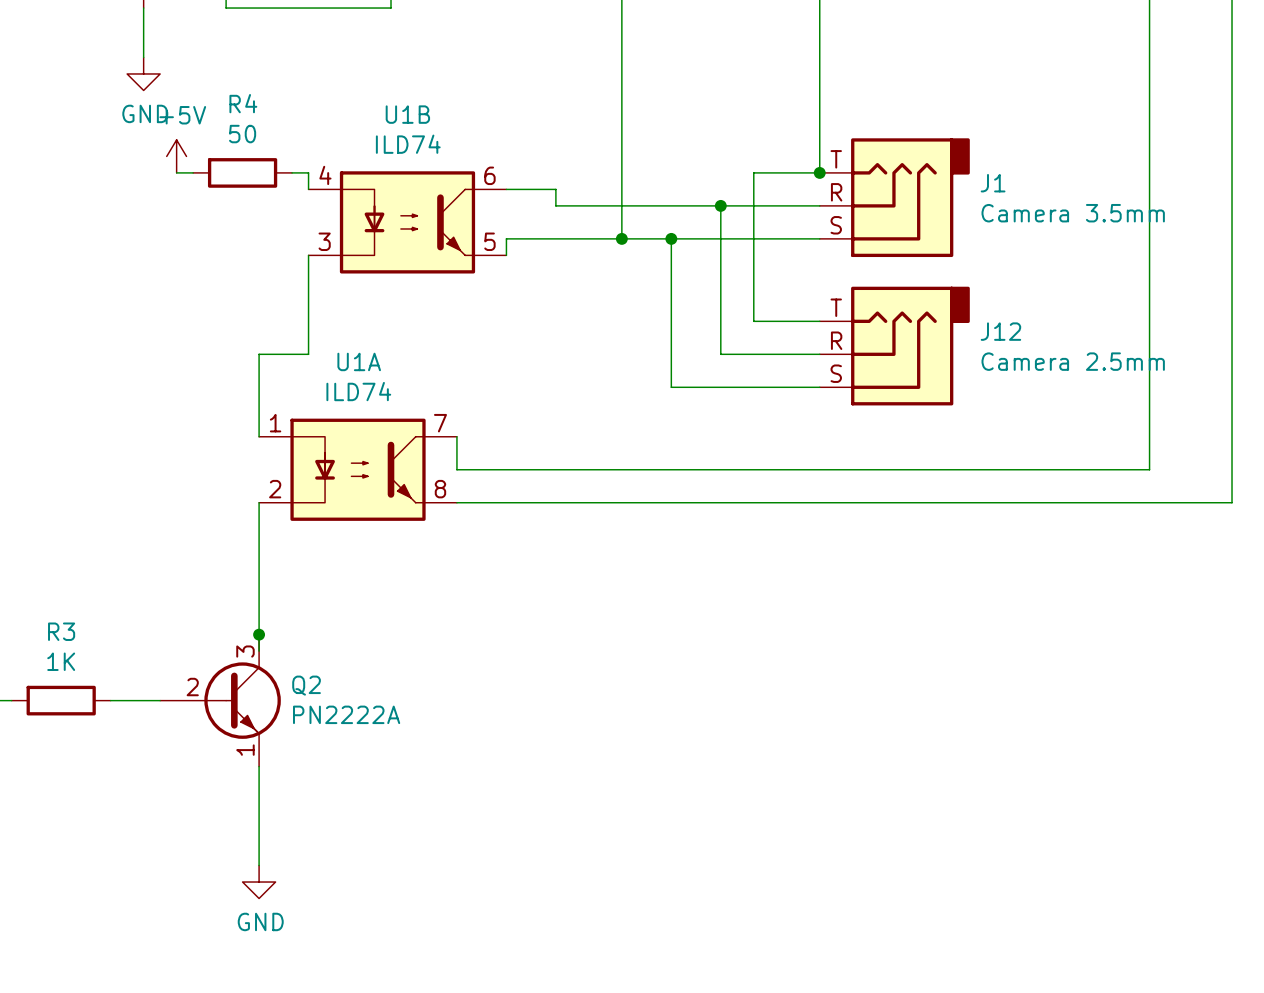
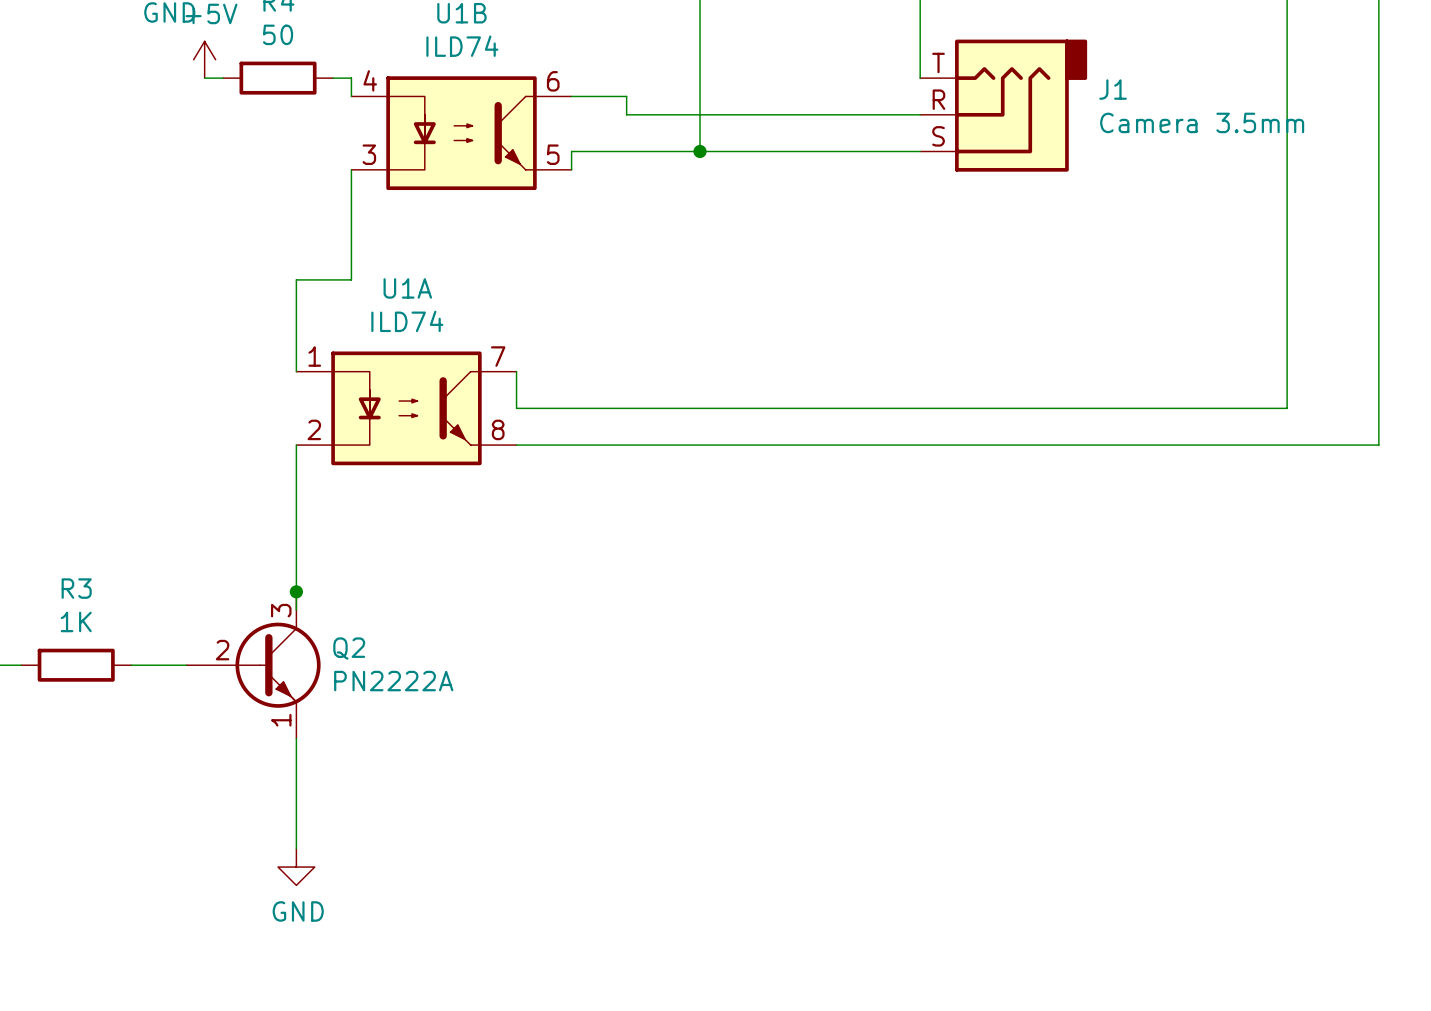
wire: (819, 172) (753, 172) (753, 321) (819, 321) -> none
junction: (819, 172) -> none
wire: (720, 205) (720, 354) (819, 354) -> none
junction: (720, 205) -> none
wire: (671, 238) (671, 387) (819, 387) -> none
junction: (671, 238) -> none
J12: Camera 2.5mm (894, 346) -> none

